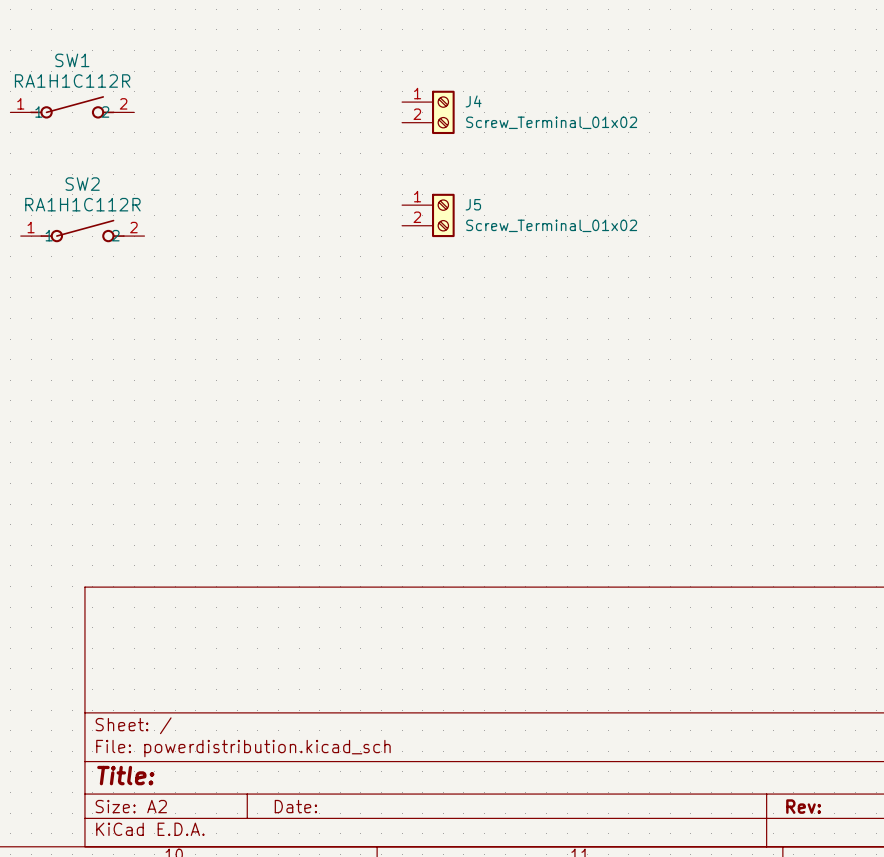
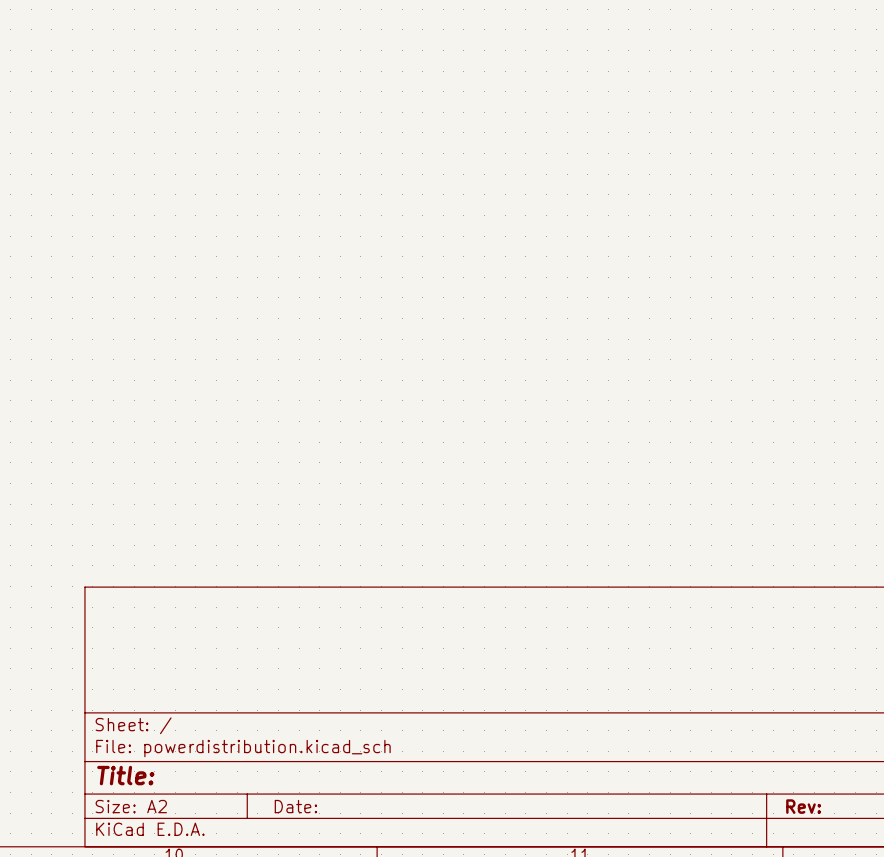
SW1: RA1H1C112R (72, 107) -> none
J4: Screw_Terminal_01x02 (428, 112) -> none
J5: Screw_Terminal_01x02 (428, 215) -> none
SW2: RA1H1C112R (82, 231) -> none

